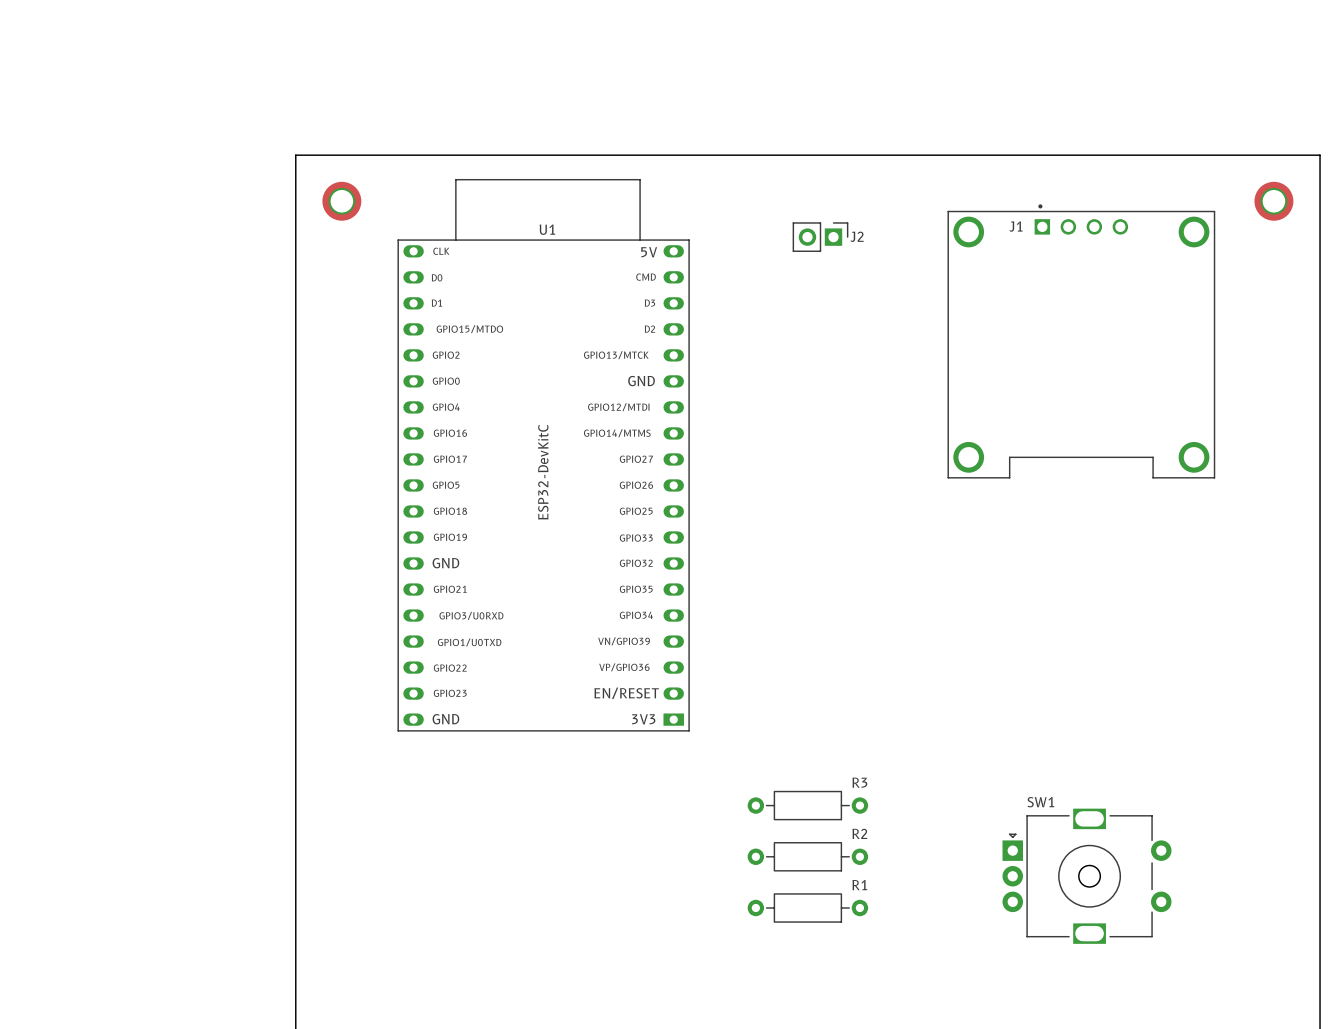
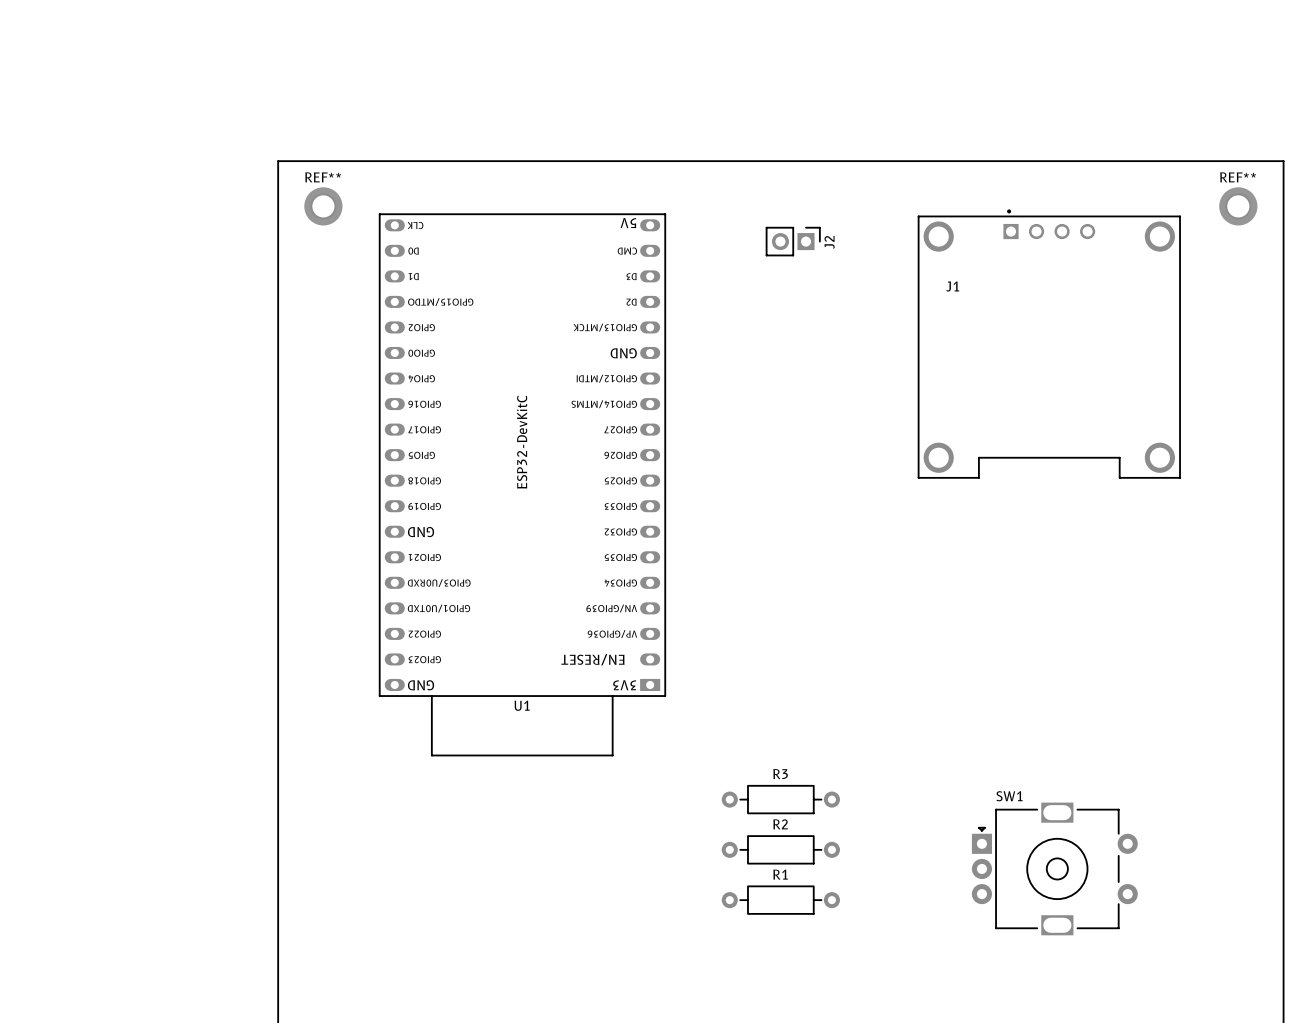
REF** name: none -> REF** (323, 177)
REF** name: none -> REF** (1238, 177)
U1 footprint: [397, 179, 690, 732] -> [379, 213, 666, 757]
J1 name position: J1 (1016, 226) -> J1 (952, 286)
U1 name position: U1 (547, 229) -> U1 (522, 705)
J2 name rotation: 0° (857, 236) -> 90° counterclockwise (829, 242)
U1 value position: ESP32-DevKitC (543, 472) -> ESP32-DevKitC (522, 442)
R3 name position: R3 (859, 782) -> R3 (780, 774)
R2 name position: R2 (859, 833) -> R2 (780, 824)
R1 name position: R1 (859, 885) -> R1 (780, 874)

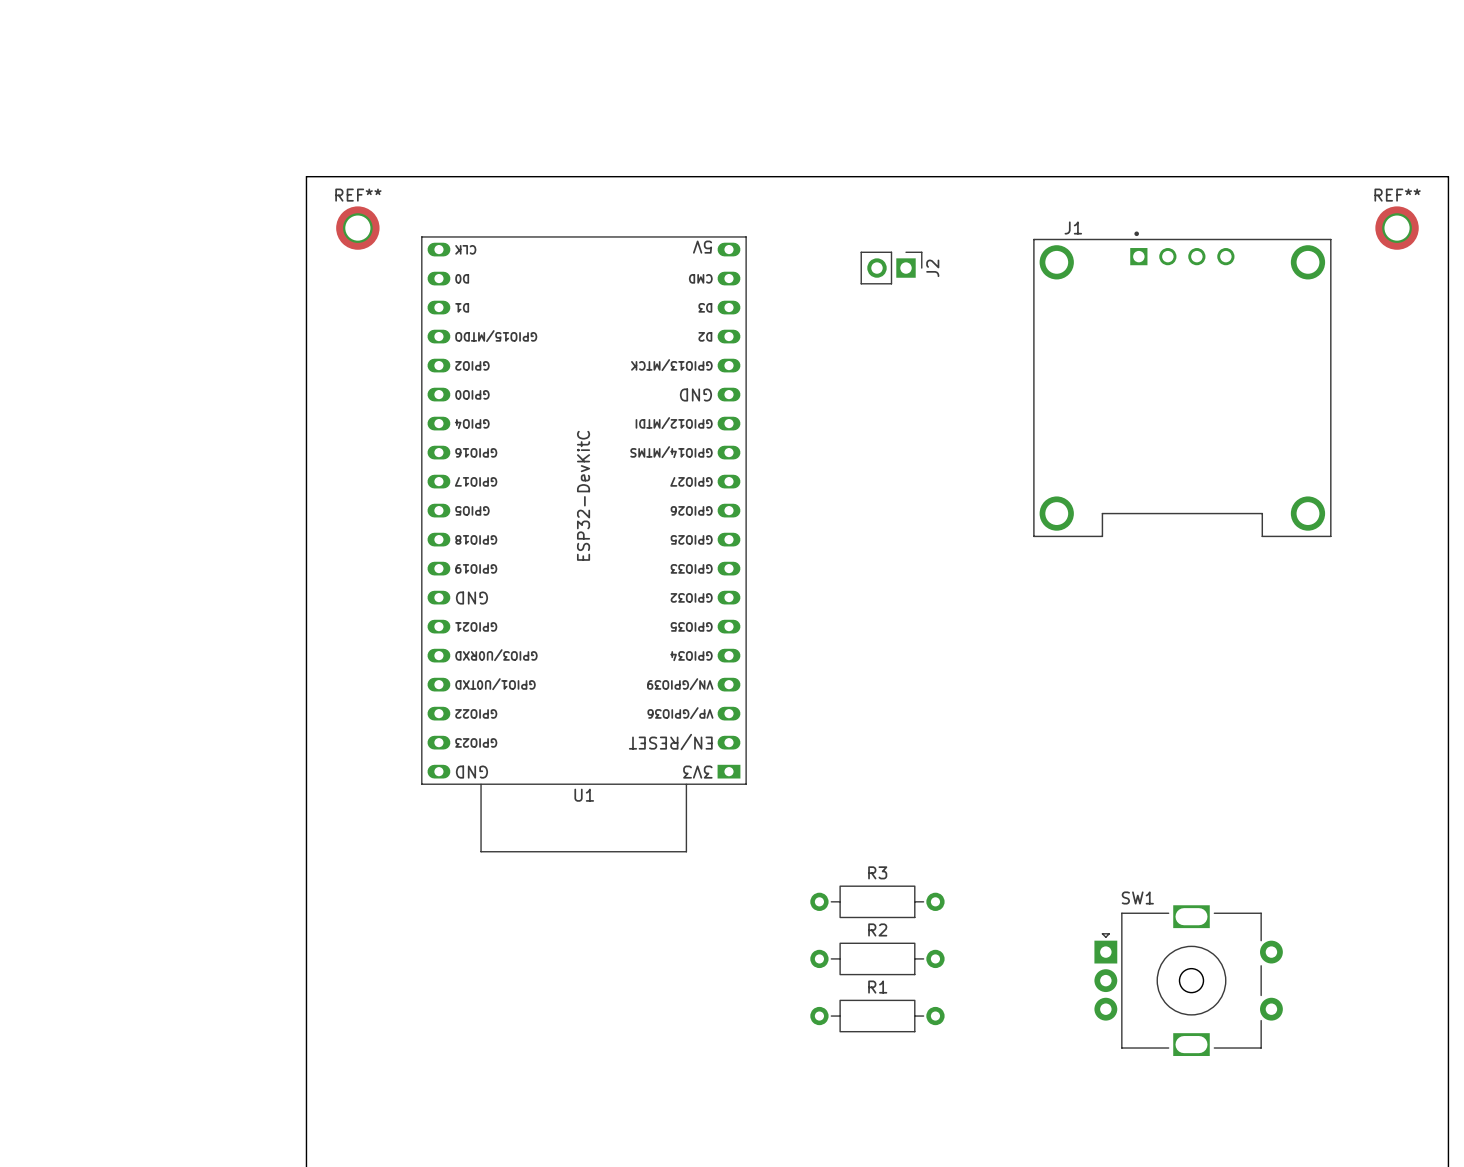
J1 name position: J1 (952, 286) -> J1 (1073, 227)

